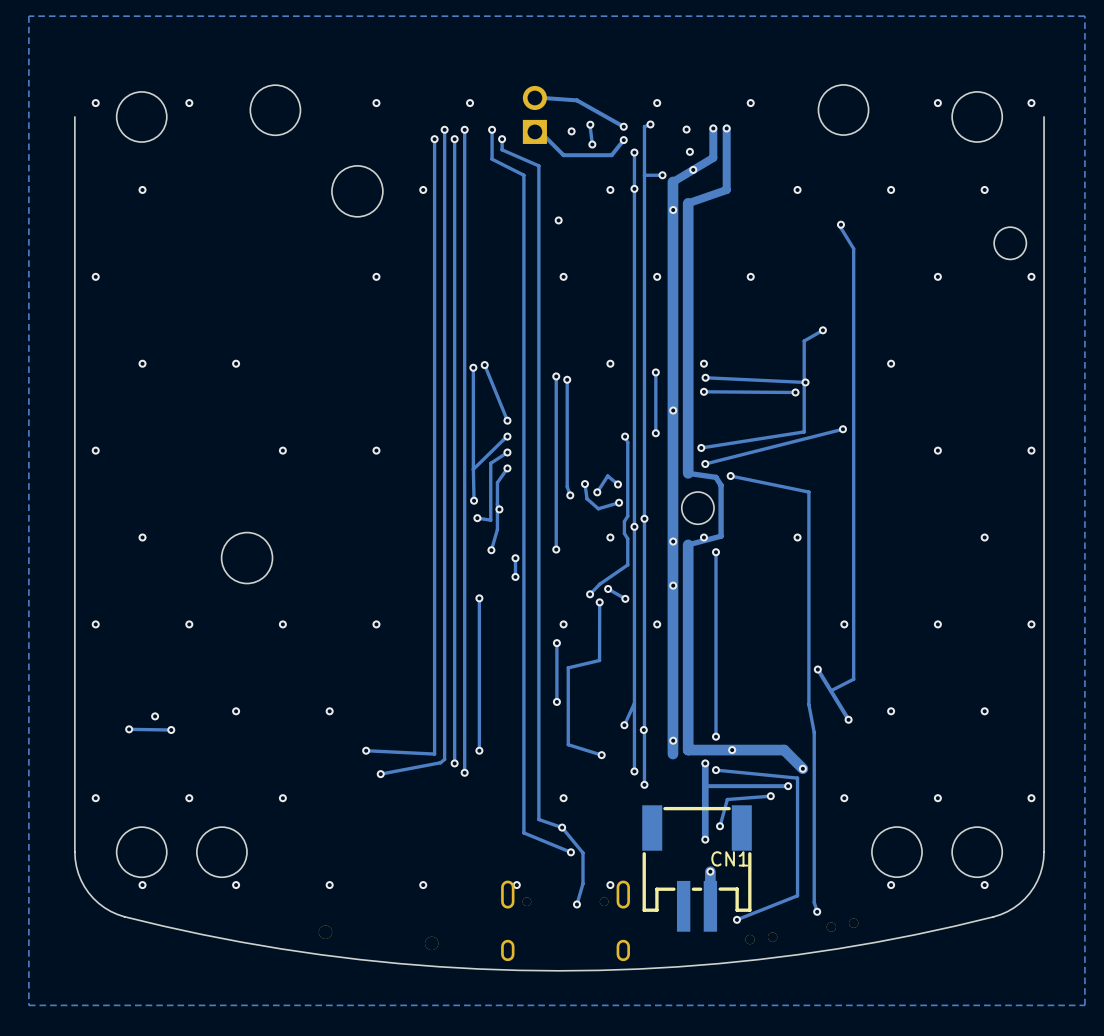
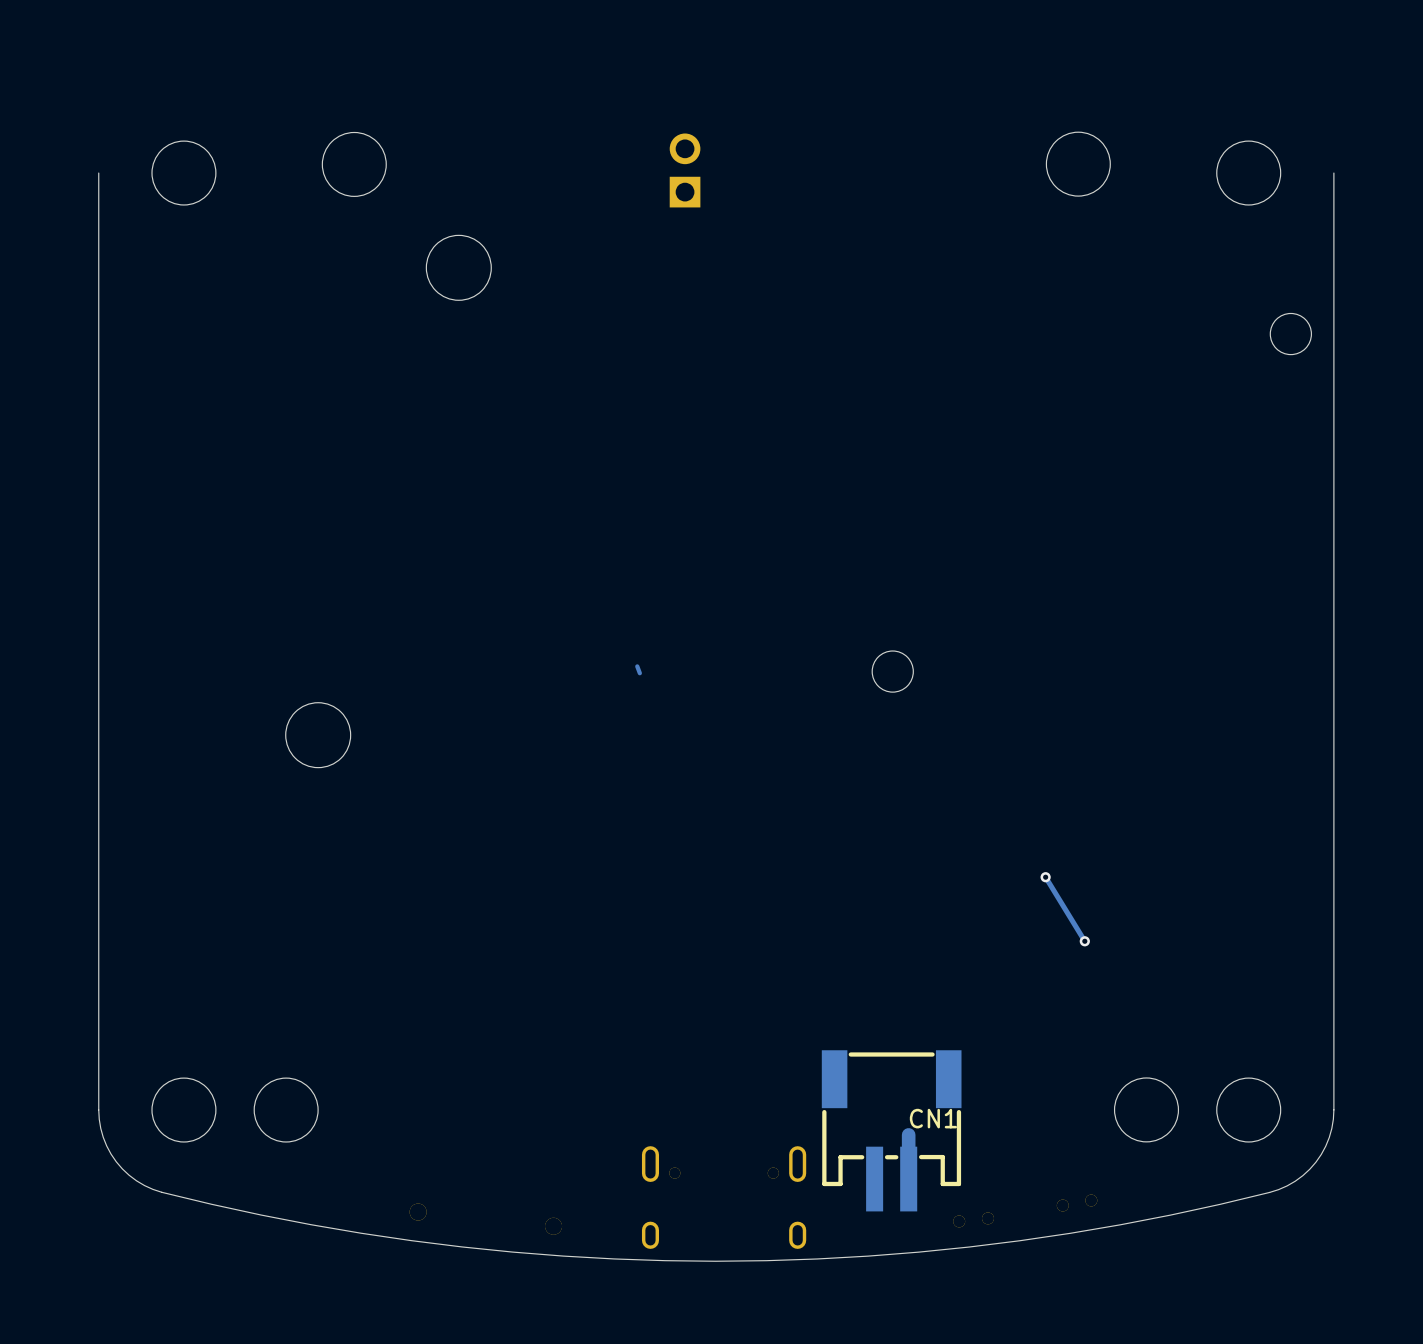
zone outline: (1084, 16) (28, 16) (28, 1005) (1084, 1005) (1084, 16) -> none
track: (534, 97) (576, 100) (623, 126) -> none
via: (95, 103) -> none
via: (189, 103) -> none
via: (376, 103) -> none
via: (470, 103) -> none
via: (657, 103) -> none
via: (750, 103) -> none
via: (937, 103) -> none
via: (1031, 103) -> none
track: (590, 124) (592, 144) -> none
via: (590, 124) -> none
track: (650, 124) (644, 126) (644, 784) -> none
via: (650, 124) -> none
via: (623, 126) -> none
track: (713, 128) (713, 157) (673, 181) -> none
via: (713, 128) -> none
track: (726, 128) (726, 189) (688, 203) (688, 473) (715, 477) (721, 485) (721, 536) (688, 544) (688, 750) (784, 750) (802, 768) -> none
via: (726, 128) -> none
track: (444, 129) (444, 759) (440, 762) (380, 774) -> none
via: (444, 129) -> none
track: (464, 129) (464, 772) -> none
via: (464, 129) -> none
track: (492, 129) (492, 159) (523, 175) (523, 832) (570, 852) -> none
via: (492, 129) -> none
via: (686, 129) -> none
track: (534, 131) (543, 135) (563, 155) (611, 155) (623, 140) -> none
via: (571, 131) -> none
track: (434, 139) (434, 754) (366, 750) -> none
via: (434, 139) -> none
track: (454, 139) (454, 763) -> none
via: (454, 139) -> none
track: (502, 139) (502, 149) (538, 165) (538, 819) (562, 827) (582, 852) (582, 883) (576, 904) -> none
via: (502, 139) -> none
via: (623, 140) -> none
via: (592, 144) -> none
via: (689, 151) -> none
track: (634, 152) (634, 771) -> none
via: (634, 152) -> none
via: (693, 169) -> none
track: (662, 175) (644, 175) -> none
via: (662, 175) -> none
track: (672, 181) (672, 754) -> none
via: (634, 188) -> none
via: (142, 189) -> none
via: (423, 189) -> none
via: (610, 189) -> none
via: (797, 189) -> none
via: (891, 189) -> none
via: (984, 189) -> none
via: (673, 210) -> none
via: (558, 220) -> none
track: (840, 224) (840, 228) (853, 248) (853, 679) (830, 690) -> none
via: (840, 224) -> none
via: (95, 276) -> none
via: (376, 276) -> none
via: (563, 276) -> none
via: (657, 276) -> none
via: (750, 276) -> none
via: (937, 276) -> none
via: (1031, 276) -> none
track: (822, 330) (804, 341) (804, 431) (701, 447) -> none
via: (822, 330) -> none
via: (142, 363) -> none
via: (236, 363) -> none
via: (610, 363) -> none
via: (703, 363) -> none
via: (891, 363) -> none
track: (484, 365) (507, 420) -> none
via: (484, 365) -> none
track: (473, 367) (473, 469) -> none
via: (473, 367) -> none
track: (655, 372) (655, 433) -> none
via: (655, 372) -> none
track: (556, 376) (556, 549) -> none
via: (556, 376) -> none
track: (705, 377) (805, 382) -> none
via: (705, 377) -> none
track: (567, 379) (567, 486) (570, 495) -> none
via: (567, 379) -> none
via: (805, 382) -> none
track: (703, 391) (795, 392) -> none
via: (703, 391) -> none
via: (795, 392) -> none
via: (673, 410) -> none
via: (507, 420) -> none
track: (842, 429) (705, 463) -> none
via: (842, 429) -> none
via: (655, 433) -> none
track: (507, 436) (473, 469) -> none
via: (507, 436) -> none
track: (625, 436) (627, 442) (627, 516) (624, 521) (624, 533) (627, 538) (627, 564) (599, 584) (590, 594) -> none
via: (625, 436) -> none
via: (701, 447) -> none
via: (95, 450) -> none
via: (282, 450) -> none
via: (376, 450) -> none
via: (937, 450) -> none
via: (1031, 450) -> none
track: (507, 452) (490, 463) (490, 520) (477, 518) -> none
via: (507, 452) -> none
via: (705, 463) -> none
track: (507, 468) (497, 482) (497, 529) (491, 550) -> none
via: (507, 468) -> none
track: (473, 469) (474, 500) -> none
track: (730, 476) (808, 492) (808, 704) (814, 732) (814, 902) (817, 911) -> none
via: (730, 476) -> none
track: (584, 484) (586, 498) (598, 508) (619, 502) -> none
via: (584, 484) -> none
track: (618, 484) (607, 476) (597, 492) -> none
via: (618, 484) -> none
via: (597, 492) -> none
via: (570, 495) -> none
via: (474, 500) -> none
via: (619, 502) -> none
via: (499, 509) -> none
via: (477, 518) -> none
via: (644, 518) -> none
via: (634, 526) -> none
via: (142, 537) -> none
via: (610, 537) -> none
via: (703, 537) -> none
via: (797, 537) -> none
via: (984, 537) -> none
via: (673, 541) -> none
via: (556, 549) -> none
via: (491, 550) -> none
track: (715, 552) (715, 736) -> none
via: (715, 552) -> none
track: (515, 558) (515, 576) -> none
via: (515, 558) -> none
via: (515, 576) -> none
via: (673, 585) -> none
track: (608, 588) (625, 598) -> none
via: (608, 588) -> none
via: (590, 594) -> none
track: (479, 598) (479, 750) -> none
via: (479, 598) -> none
via: (625, 598) -> none
track: (599, 602) (599, 660) (568, 667) (568, 744) (601, 755) -> none
via: (599, 602) -> none
via: (95, 624) -> none
via: (189, 624) -> none
via: (282, 624) -> none
via: (376, 624) -> none
via: (563, 624) -> none
via: (657, 624) -> none
via: (844, 624) -> none
via: (937, 624) -> none
via: (1031, 624) -> none
track: (556, 643) (556, 701) -> none
via: (556, 643) -> none
via: (556, 701) -> none
track: (634, 703) (624, 725) -> none
via: (236, 711) -> none
via: (329, 711) -> none
via: (891, 711) -> none
via: (984, 711) -> none
via: (155, 716) -> none
via: (624, 725) -> none
track: (129, 729) (171, 730) -> none
via: (129, 729) -> none
via: (171, 730) -> none
via: (643, 730) -> none
via: (715, 736) -> none
via: (673, 740) -> none
via: (366, 750) -> none
via: (479, 750) -> none
via: (732, 750) -> none
via: (601, 755) -> none
via: (454, 763) -> none
track: (705, 763) (705, 839) -> none
via: (705, 763) -> none
via: (802, 768) -> none
track: (715, 770) (797, 778) (797, 895) (736, 919) -> none
via: (715, 770) -> none
via: (634, 771) -> none
via: (464, 772) -> none
via: (380, 774) -> none
via: (644, 784) -> none
track: (788, 786) (705, 786) -> none
via: (788, 786) -> none
track: (770, 796) (727, 799) (720, 826) -> none
via: (770, 796) -> none
via: (95, 798) -> none
via: (189, 798) -> none
via: (282, 798) -> none
via: (563, 798) -> none
via: (844, 798) -> none
via: (937, 798) -> none
via: (1031, 798) -> none
via: (720, 826) -> none
via: (562, 827) -> none
via: (705, 839) -> none
via: (570, 852) -> none
via: (710, 871) -> none
via: (142, 885) -> none
via: (236, 885) -> none
via: (329, 885) -> none
via: (423, 885) -> none
via: (516, 885) -> none
via: (610, 885) -> none
via: (891, 885) -> none
via: (984, 885) -> none
via: (576, 904) -> none
via: (817, 911) -> none
via: (736, 919) -> none

